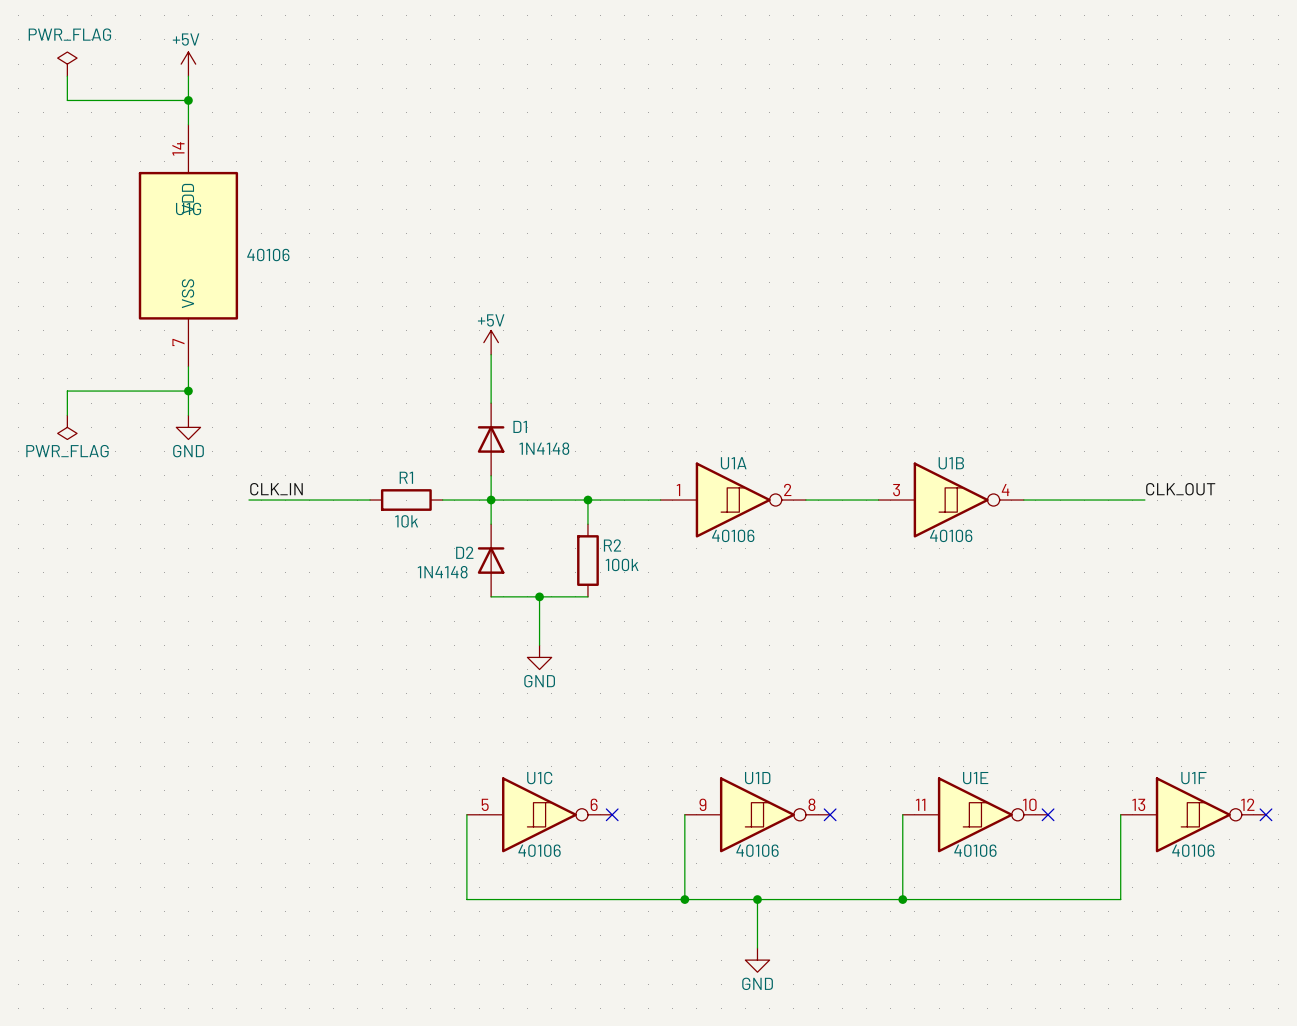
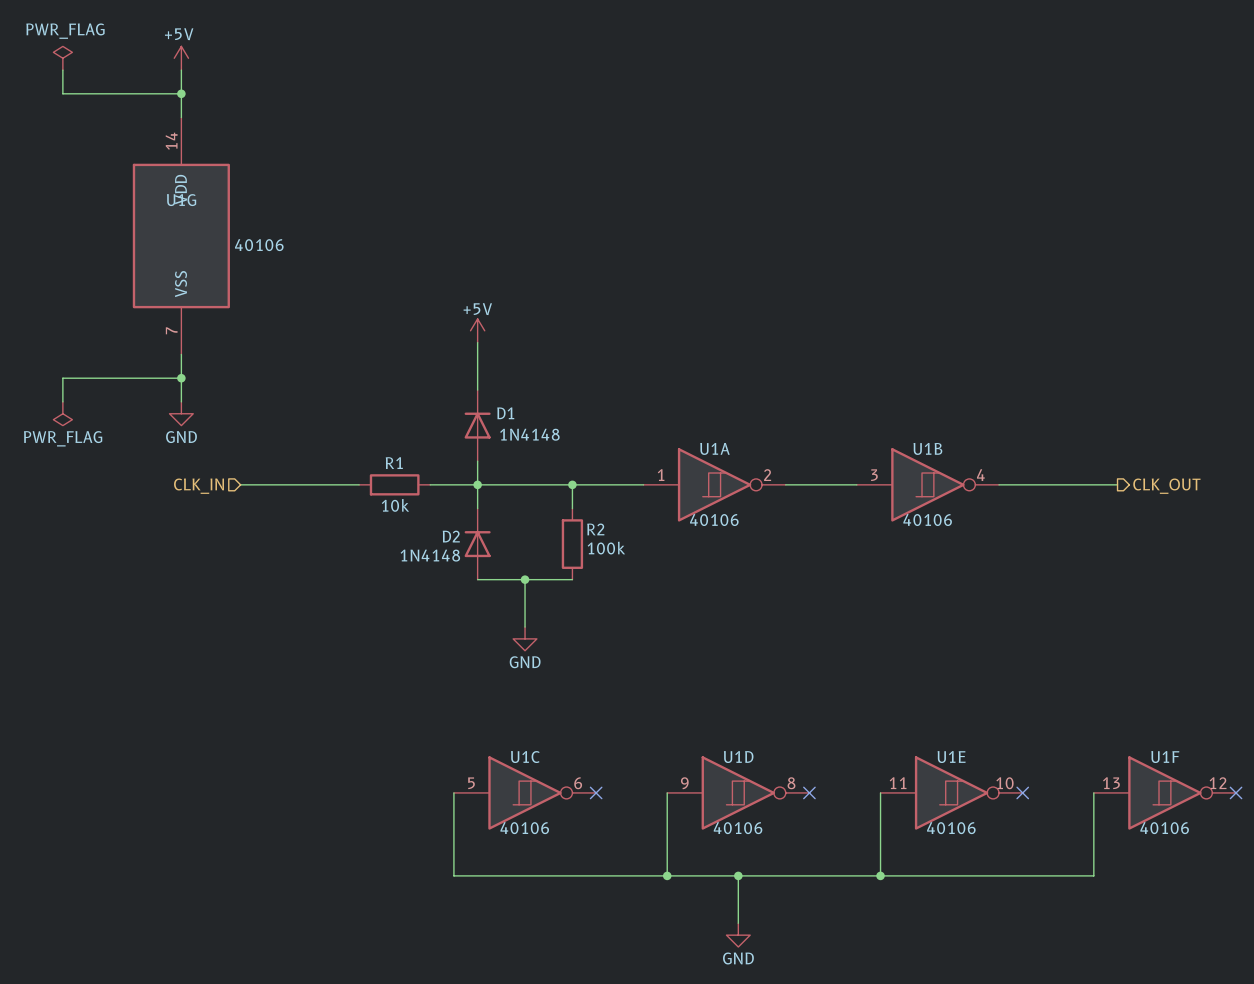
label: CLK_IN (276, 489) -> none
label: CLK_OUT (1180, 489) -> none
hierarchical label: none -> CLK_IN (199, 486)
hierarchical label: none -> CLK_OUT (1166, 486)

